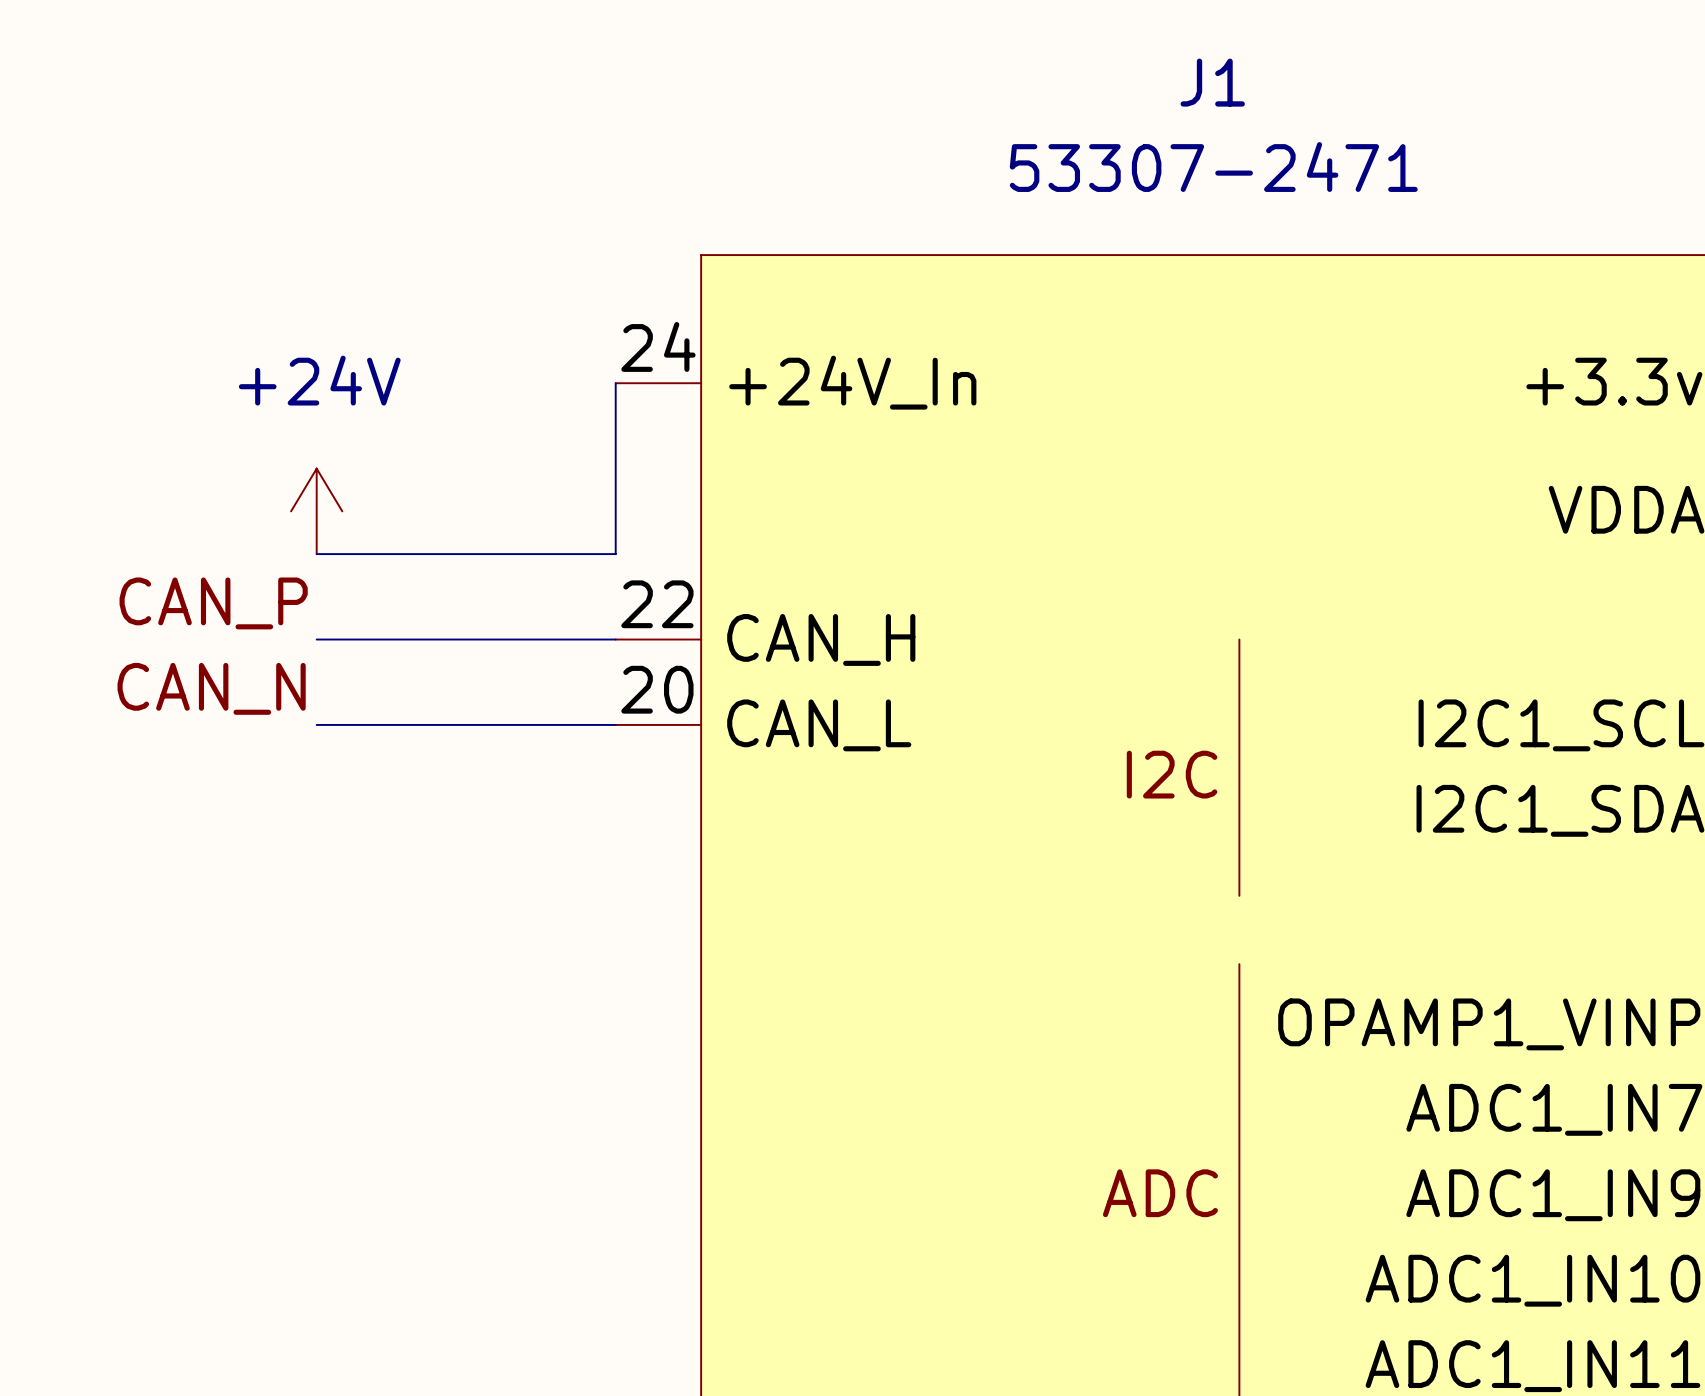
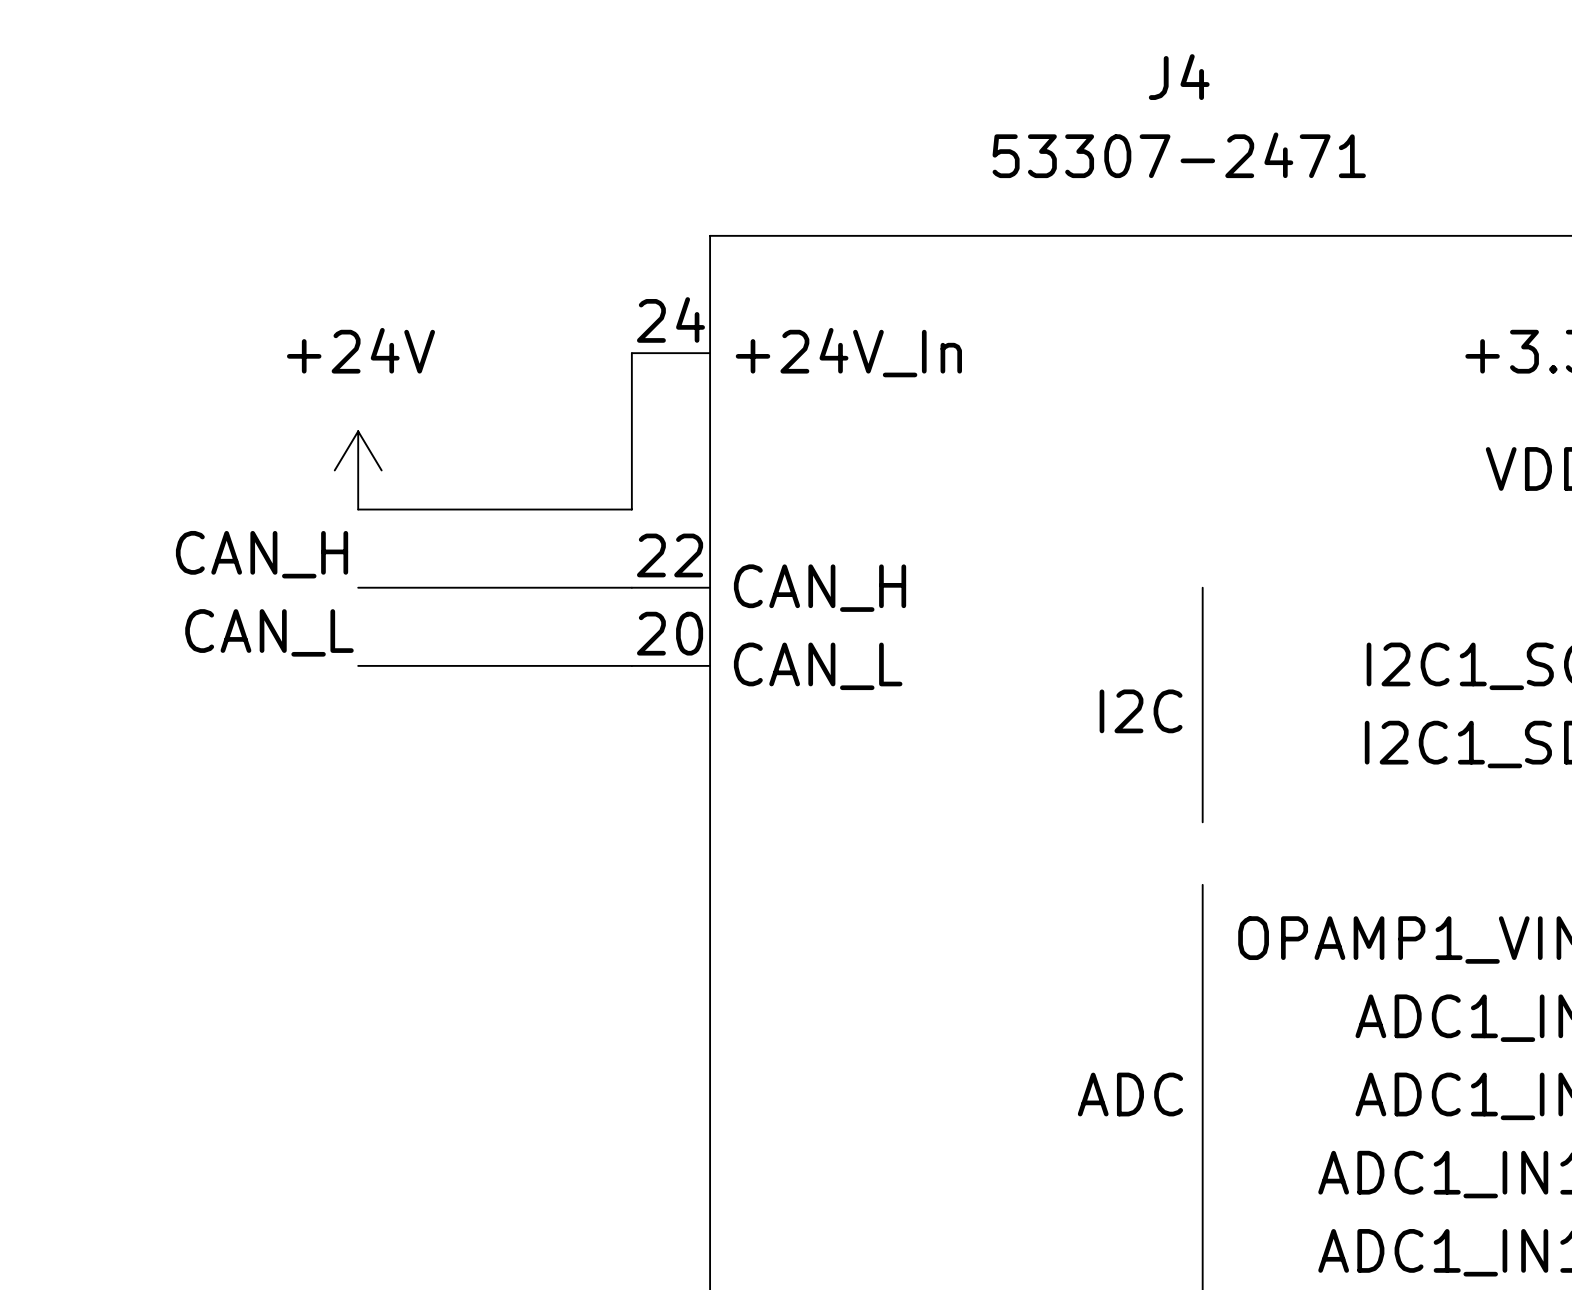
J1 name: J1 (1212, 82) -> J4 (1179, 77)
label: CAN_P (213, 603) -> CAN_H (262, 554)
label: CAN_N (211, 688) -> CAN_L (269, 632)

